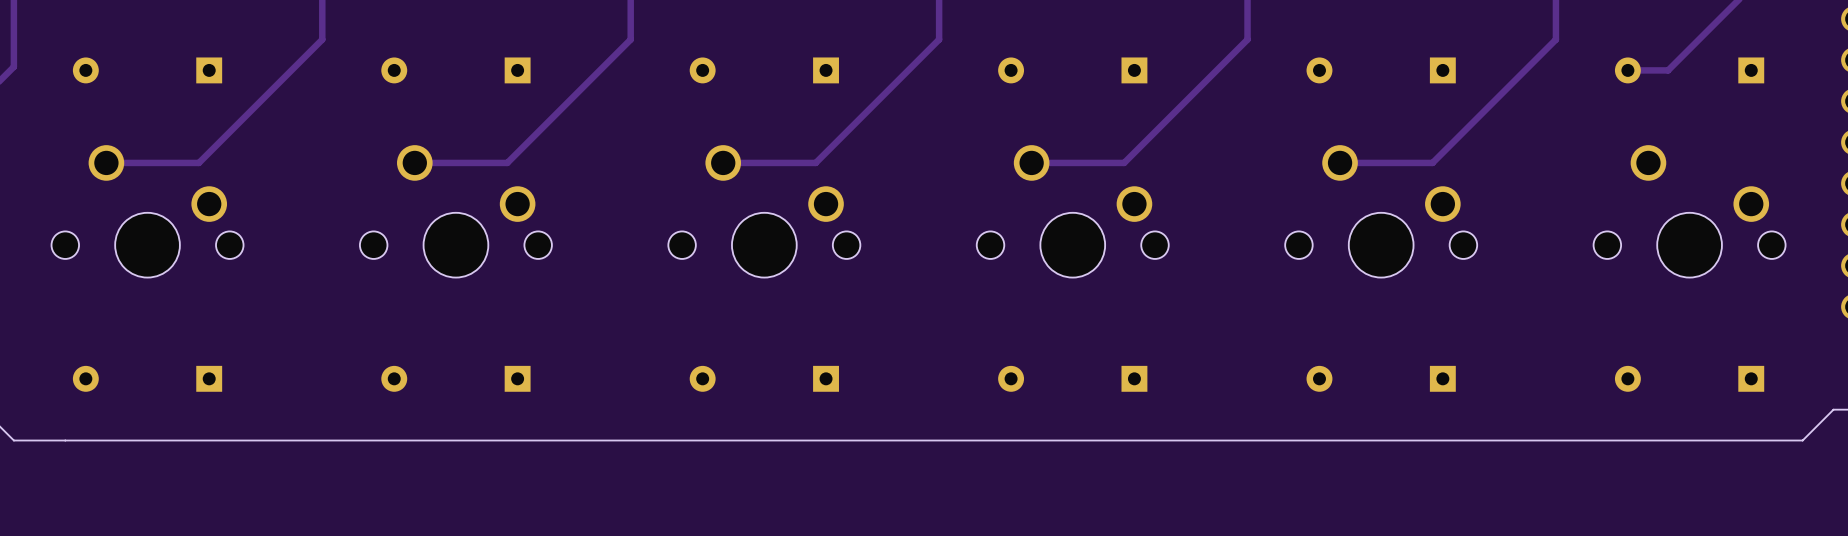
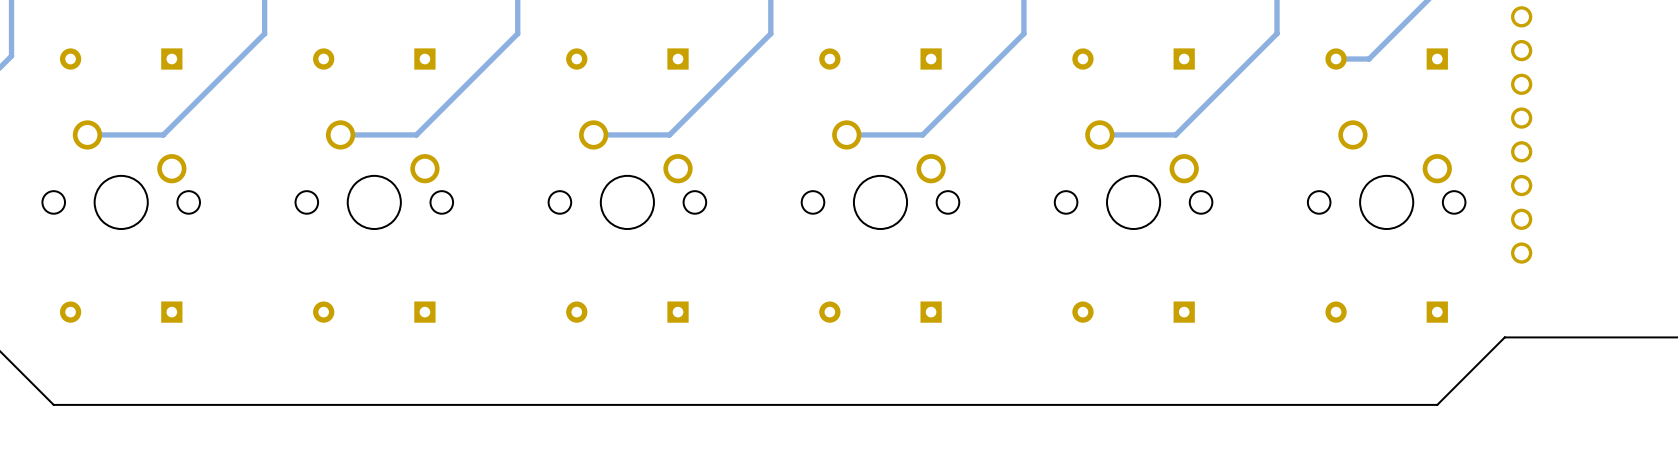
board edge: (1802, 440) (13, 440) -> (1479, 362) (1437, 404) (53, 404) (11, 362)

